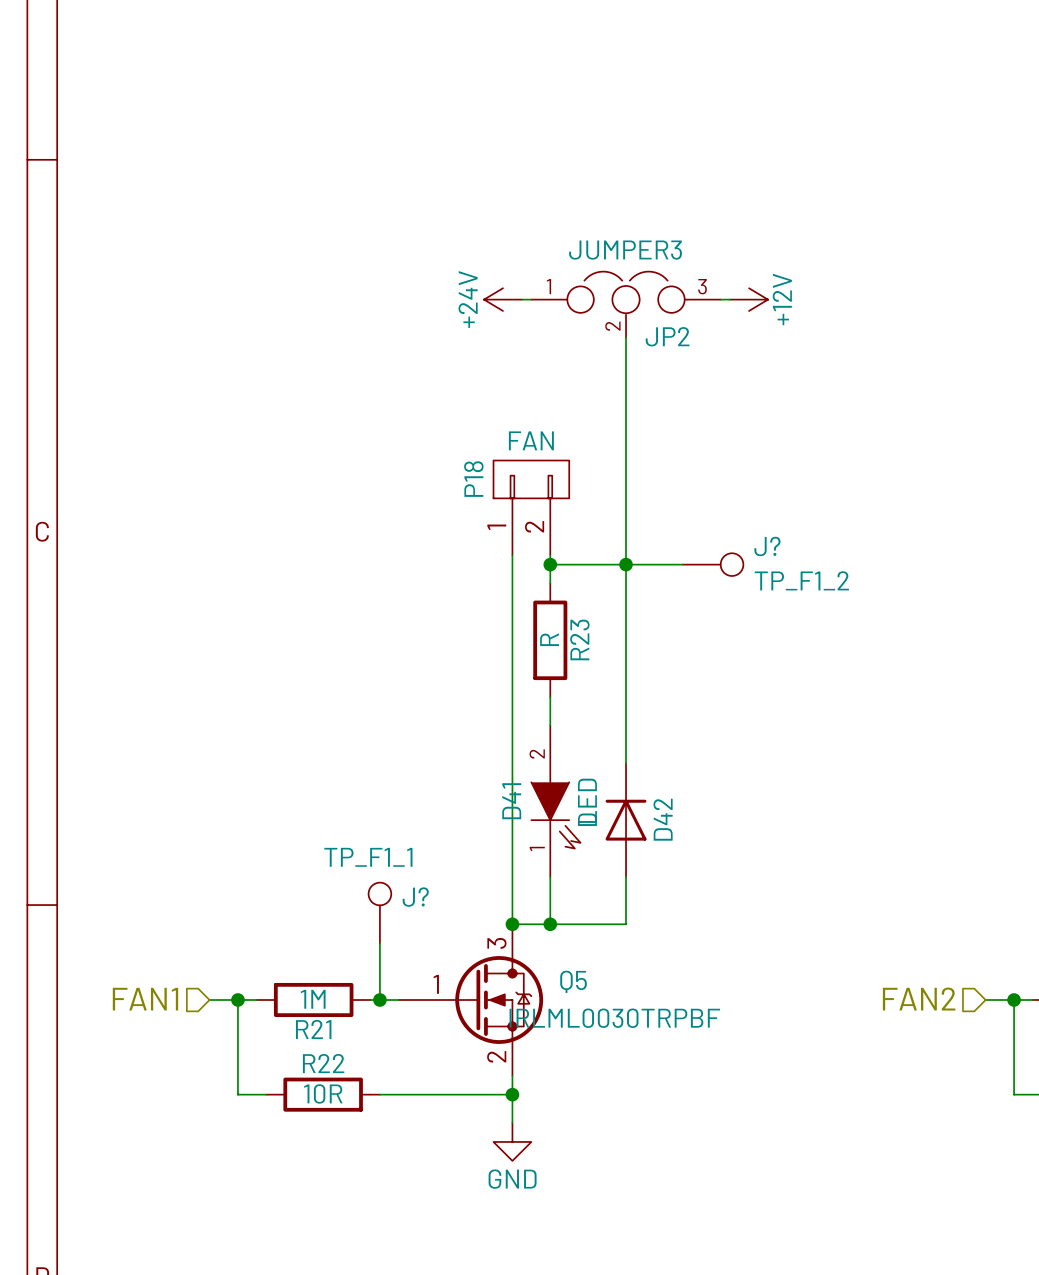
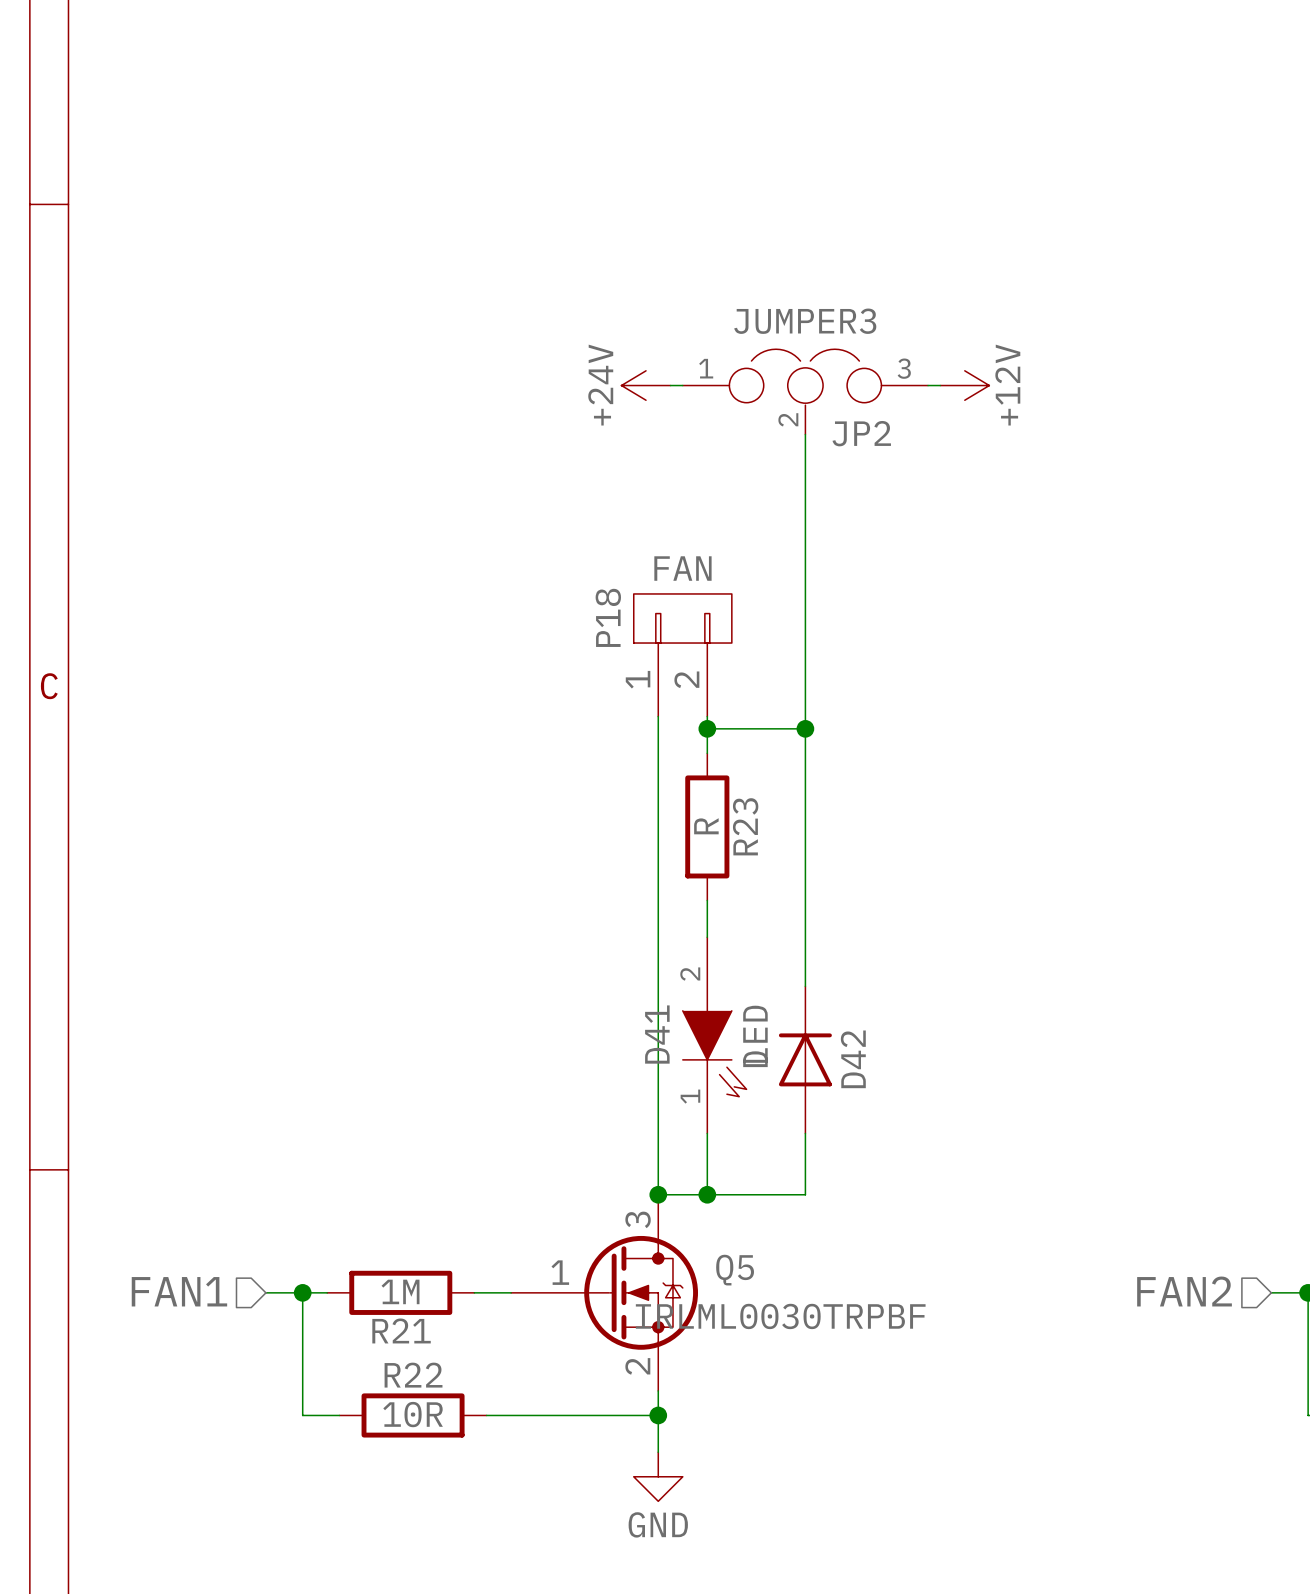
wire: (626, 564) (682, 564) -> none
J?: TP_F1_2 (713, 564) -> none
J?: TP_F1_1 (379, 912) -> none
wire: (379, 943) (379, 1000) -> none
junction: (379, 1000) -> none

